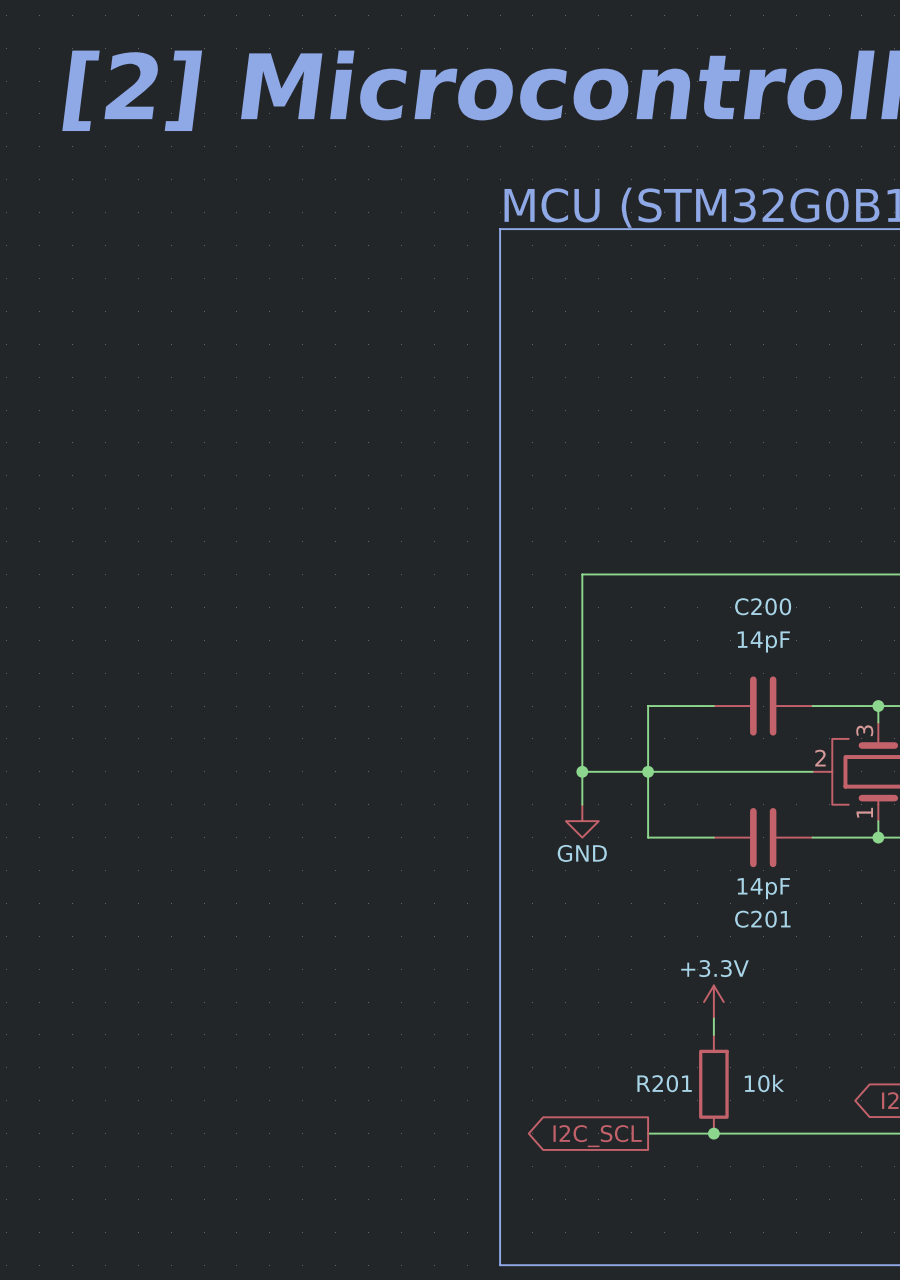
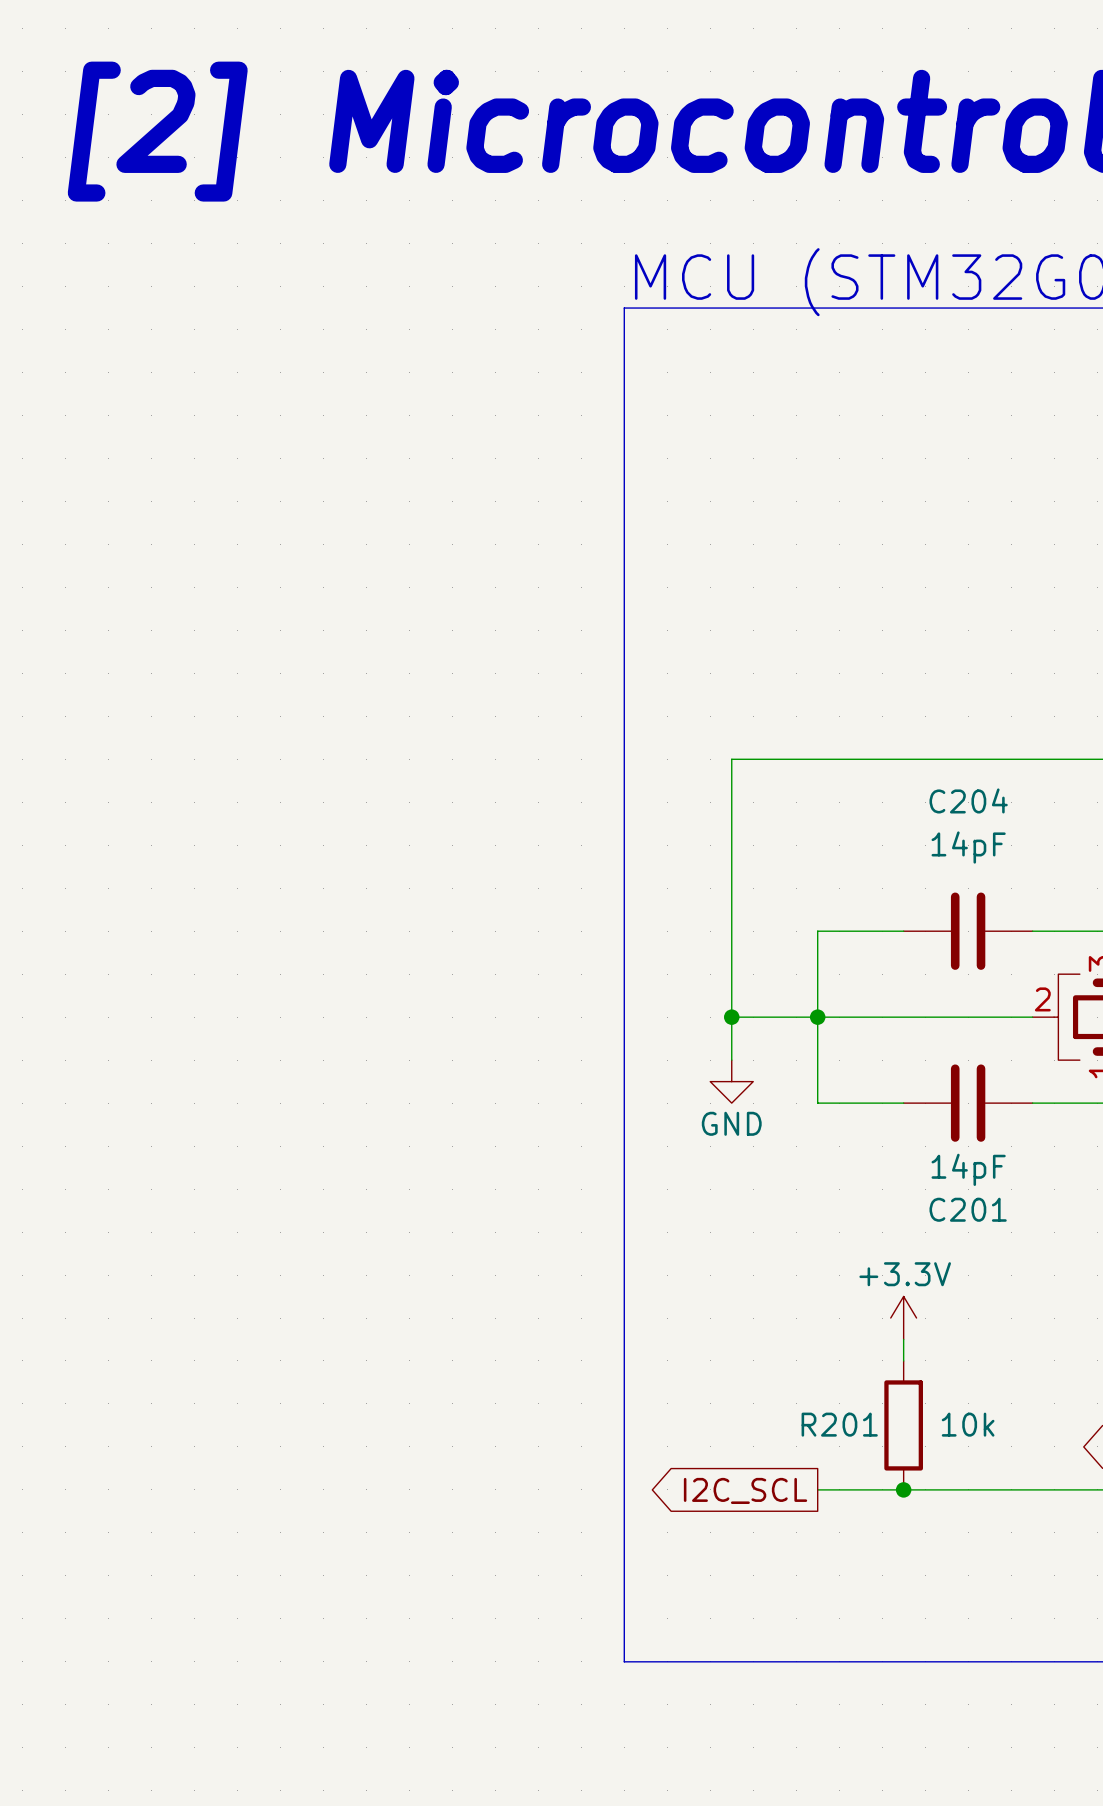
C200 name: C200 (763, 606) -> C204 (968, 800)

